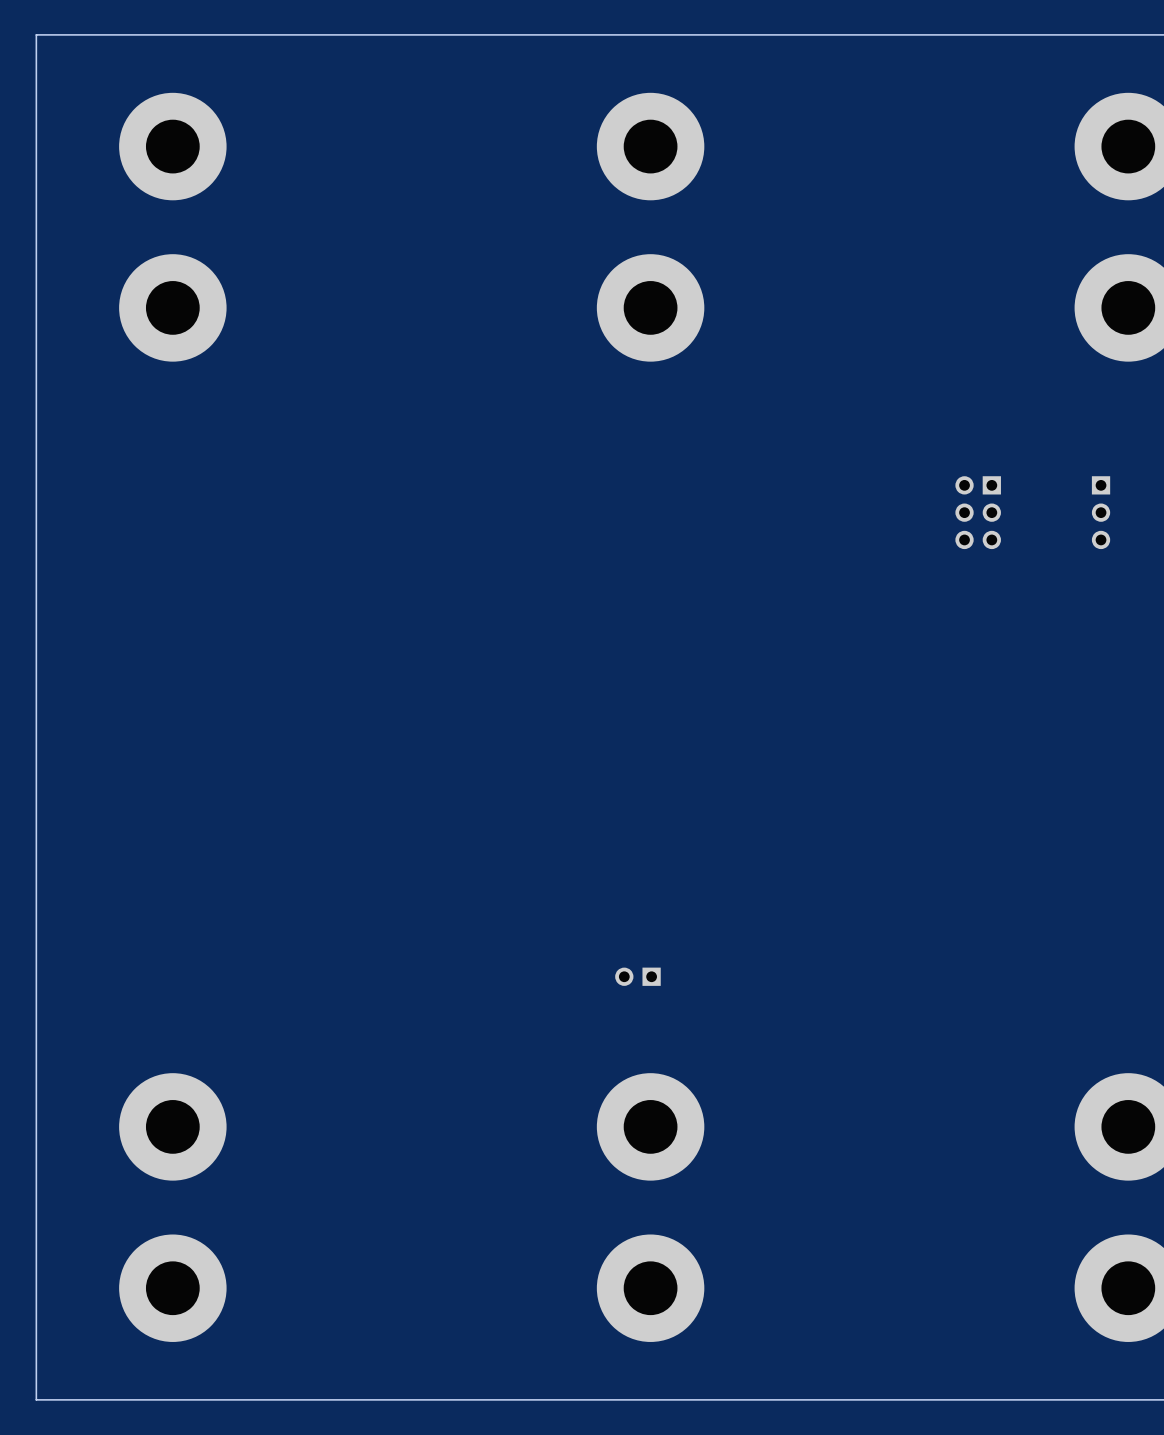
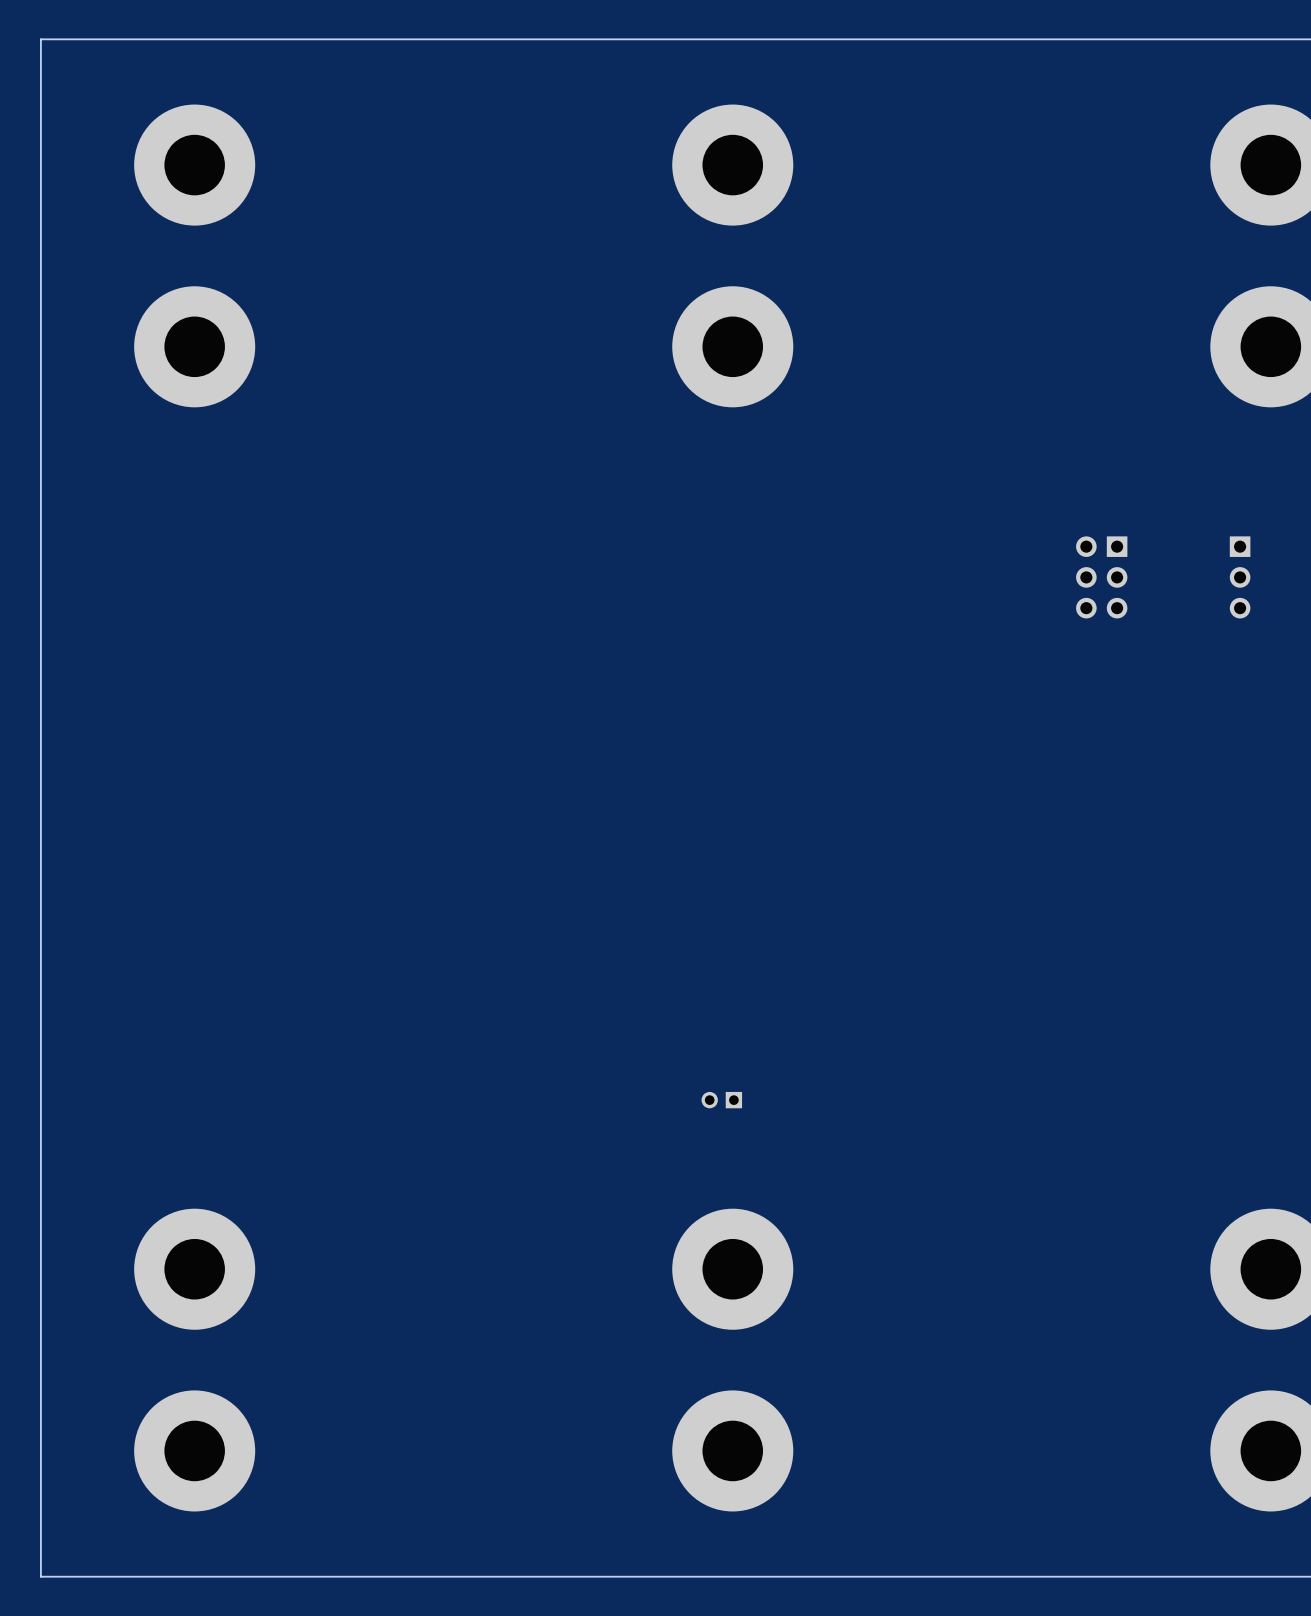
part footprint: [615, 967, 661, 986] -> [701, 1091, 743, 1109]

